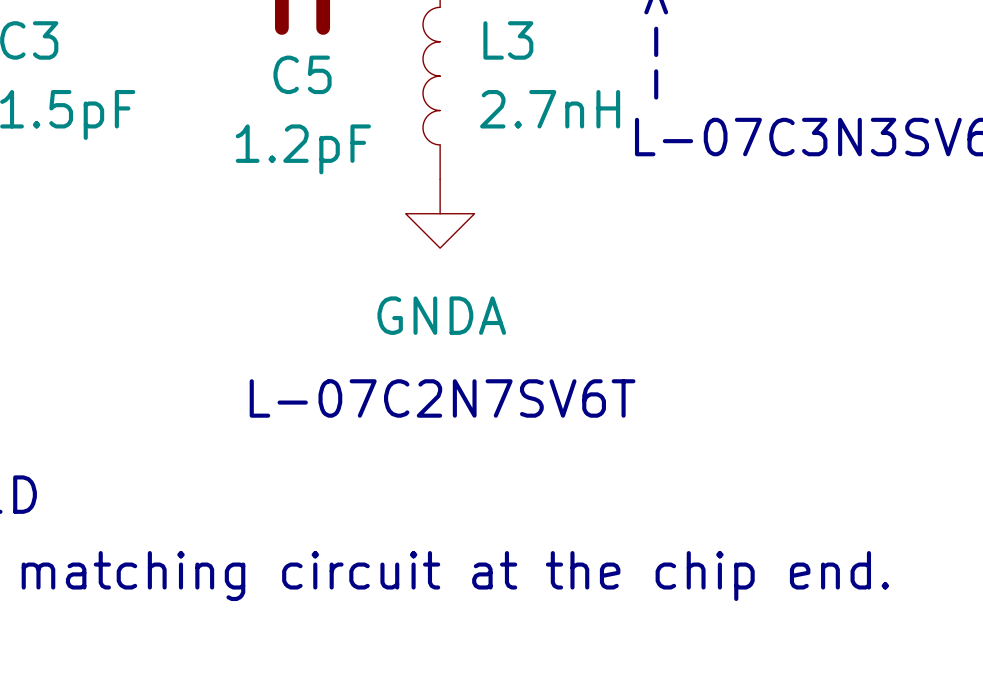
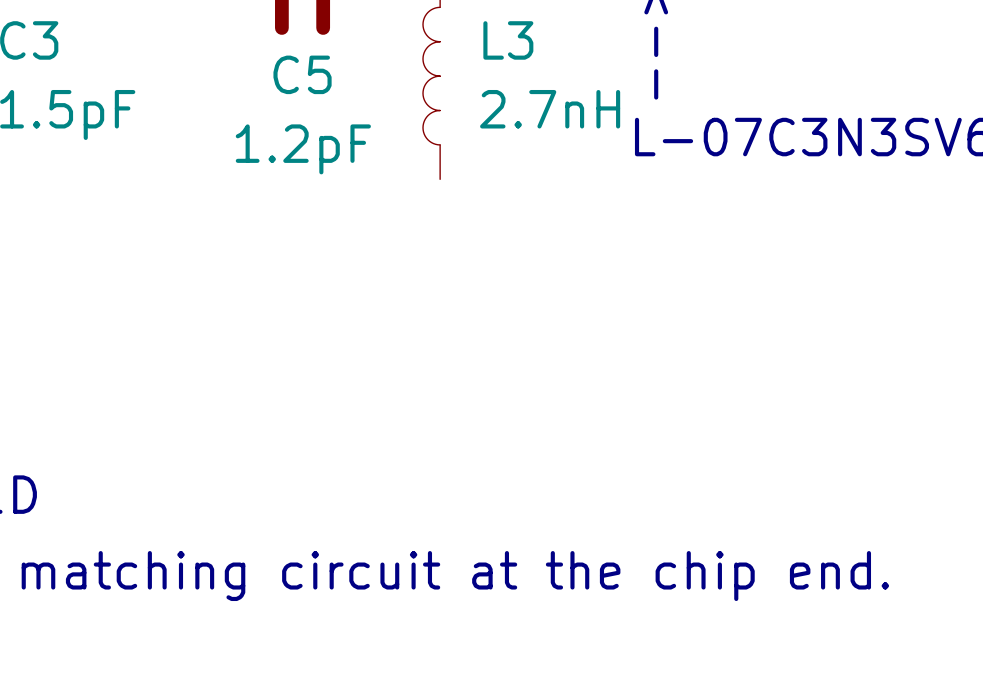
power symbol: GNDA (440, 213) -> none
text: L-07C2N7SV6T (442, 398) -> none

